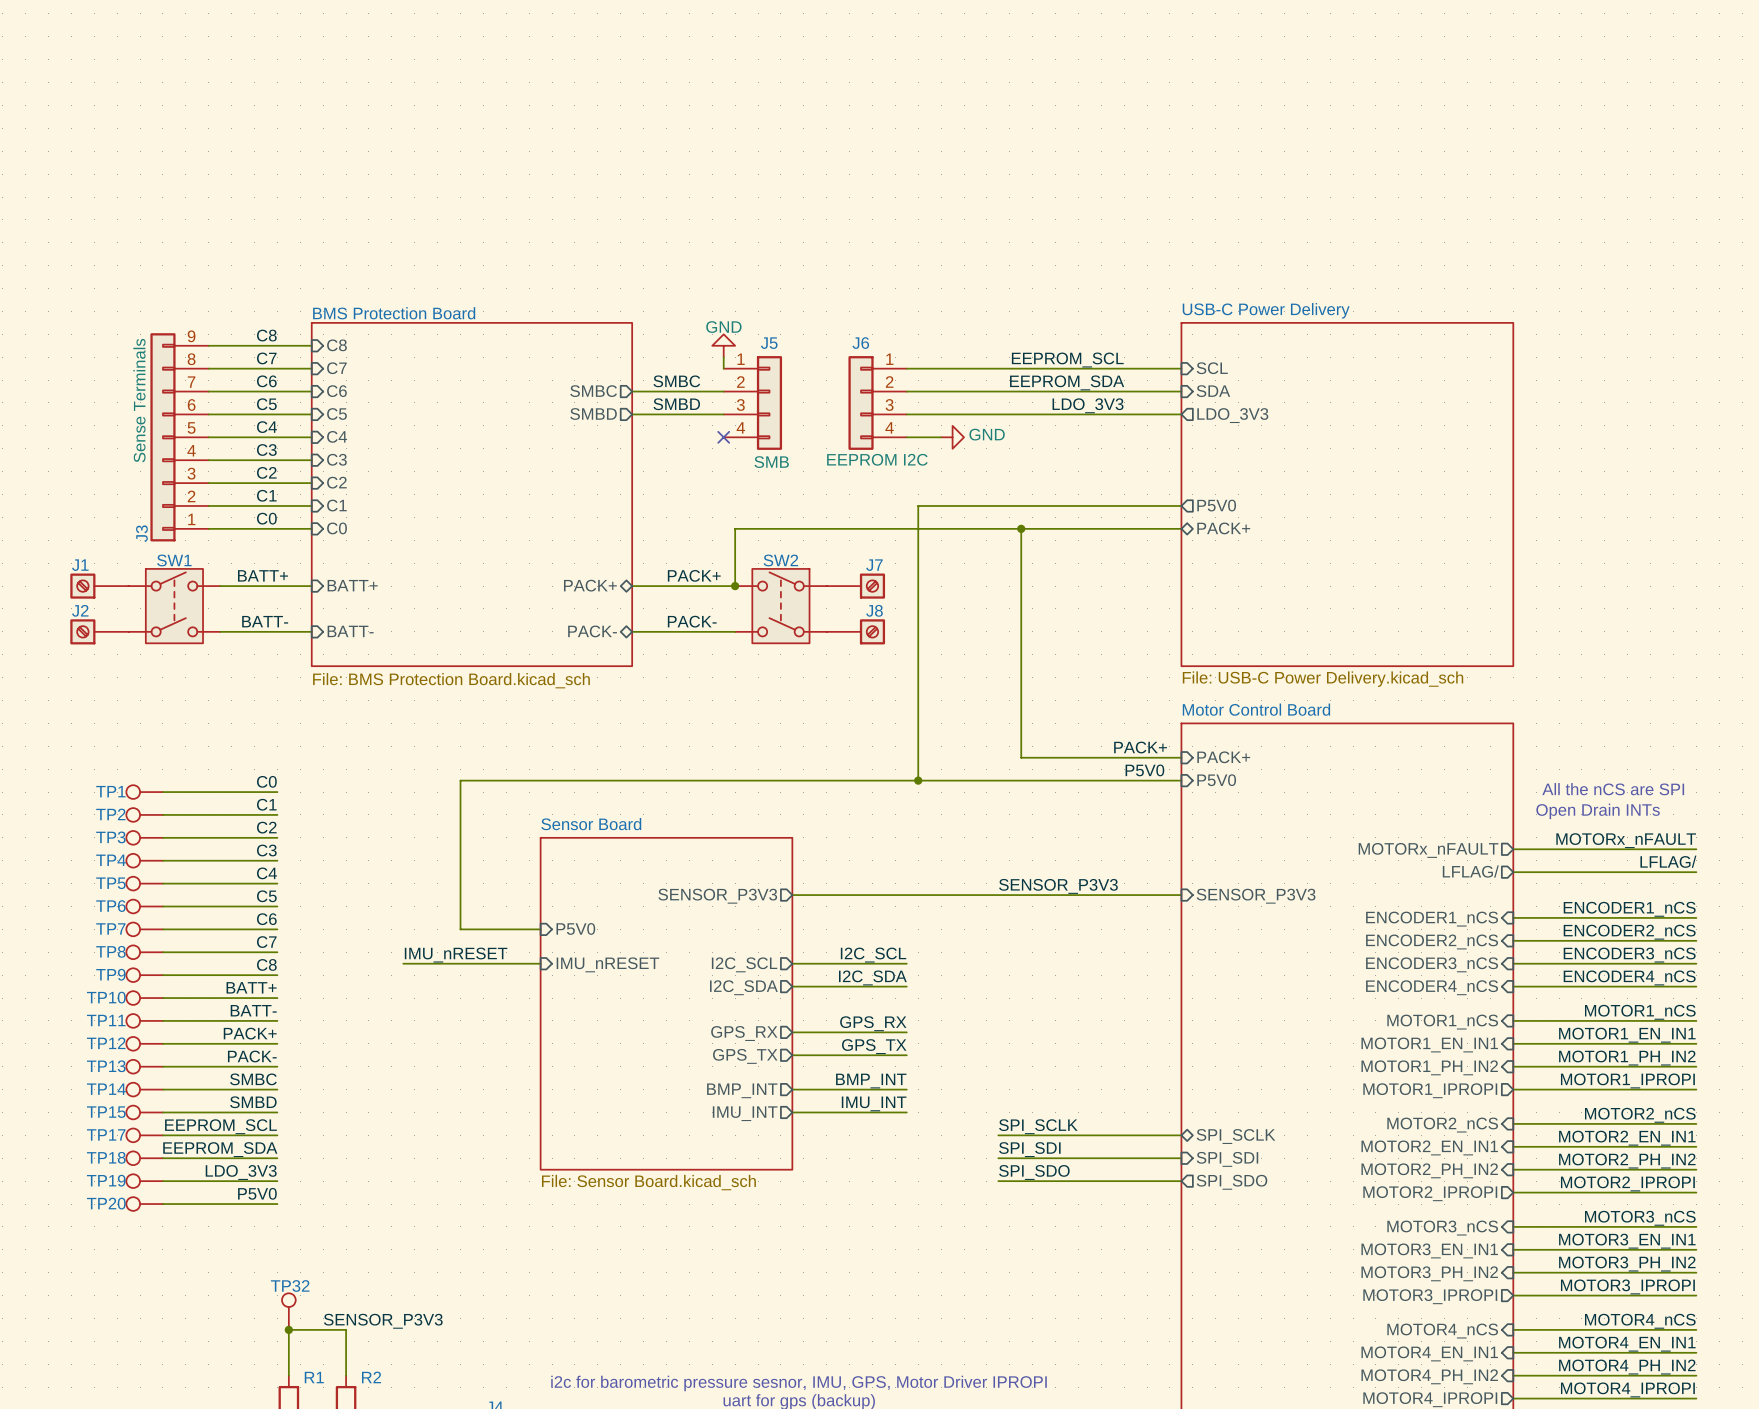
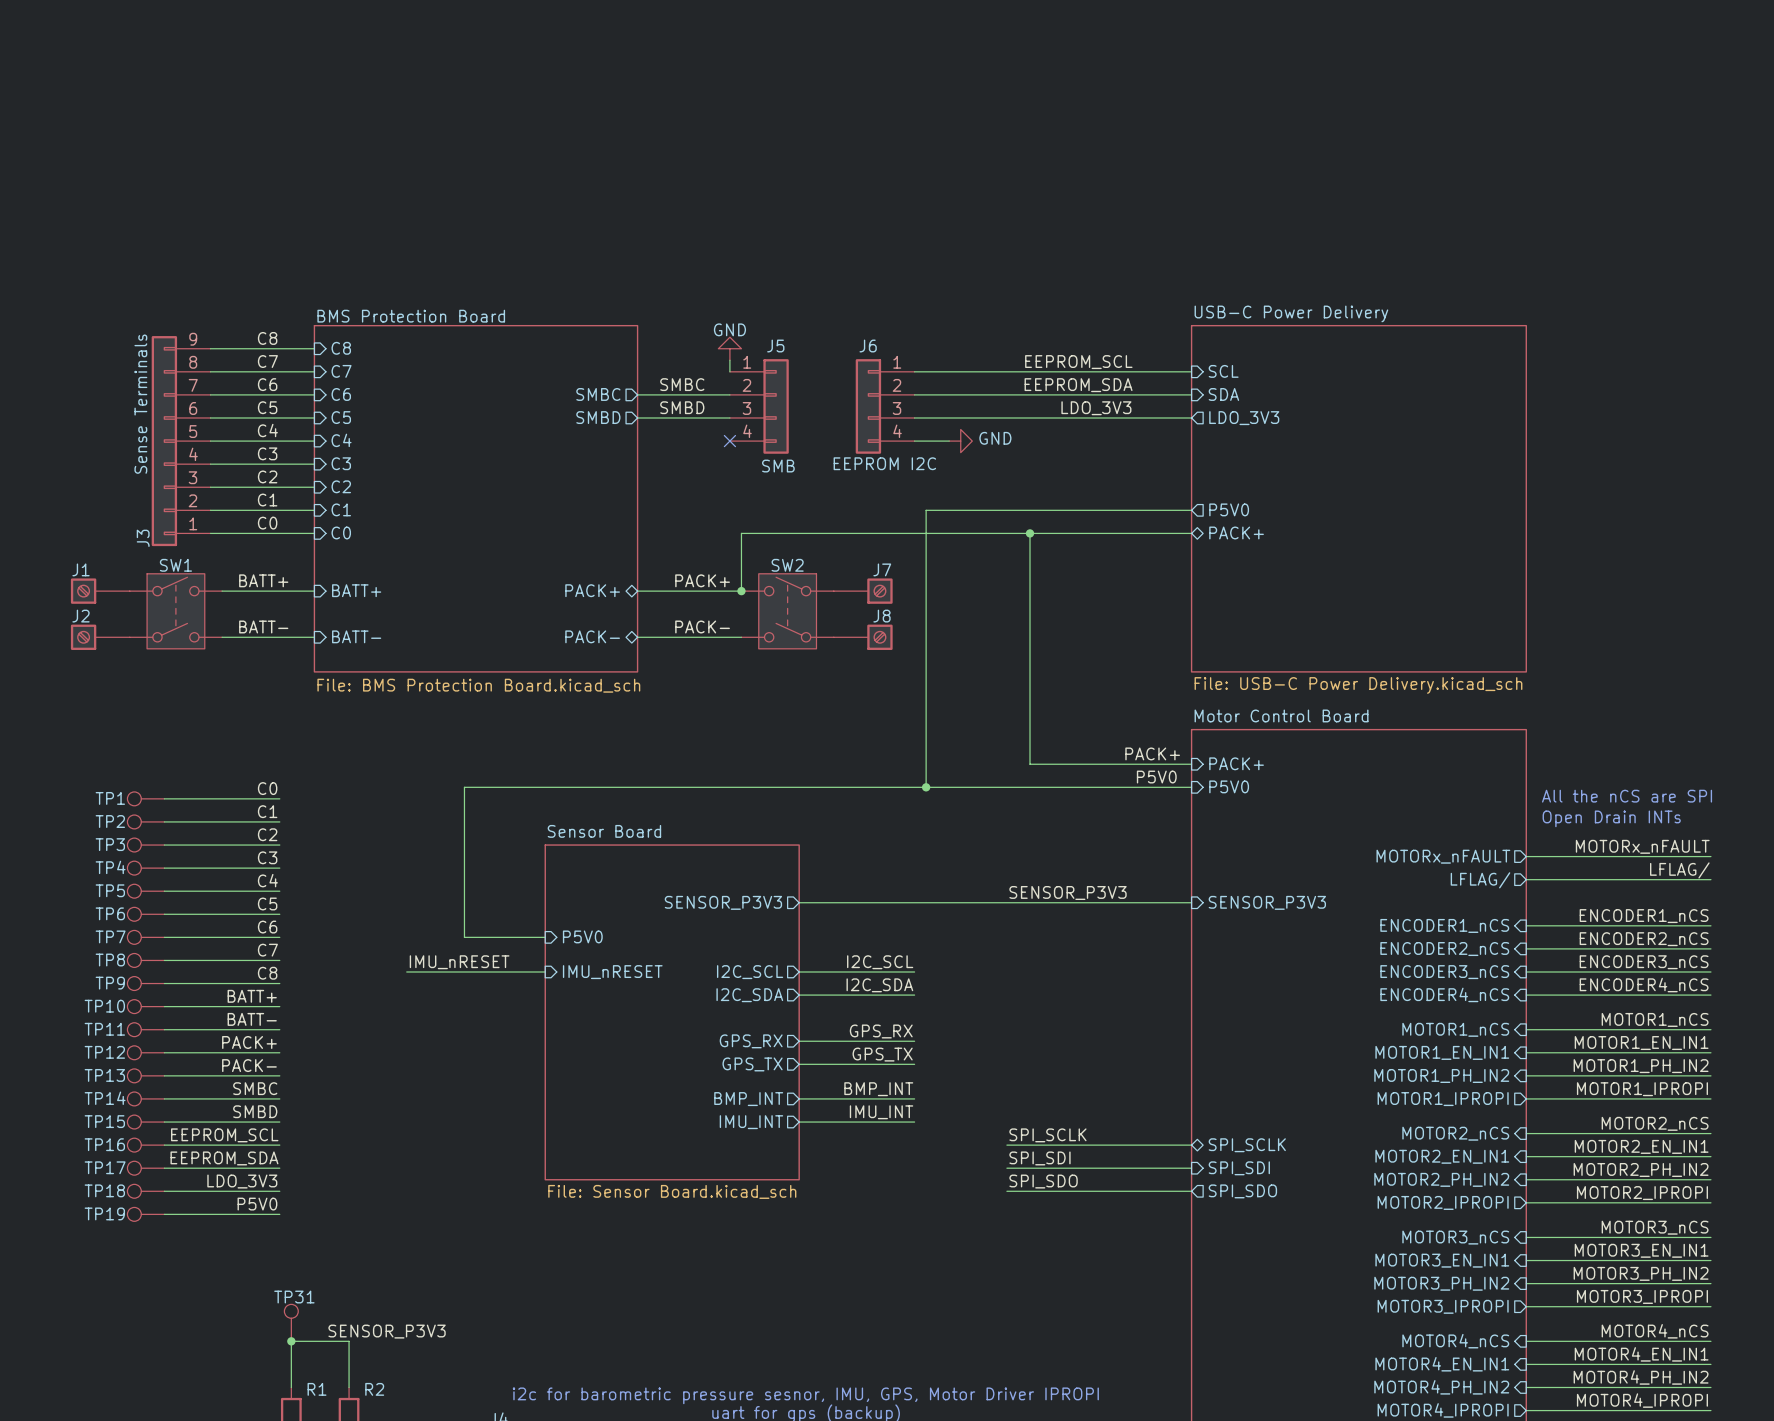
TP17 name: TP17 (106, 1134) -> TP16 (104, 1144)
TP18 name: TP18 (106, 1157) -> TP17 (105, 1167)
TP19 name: TP19 (106, 1180) -> TP18 (104, 1190)
TP20 name: TP20 (106, 1203) -> TP19 (104, 1213)
TP32 name: TP32 (290, 1285) -> TP31 (294, 1297)

